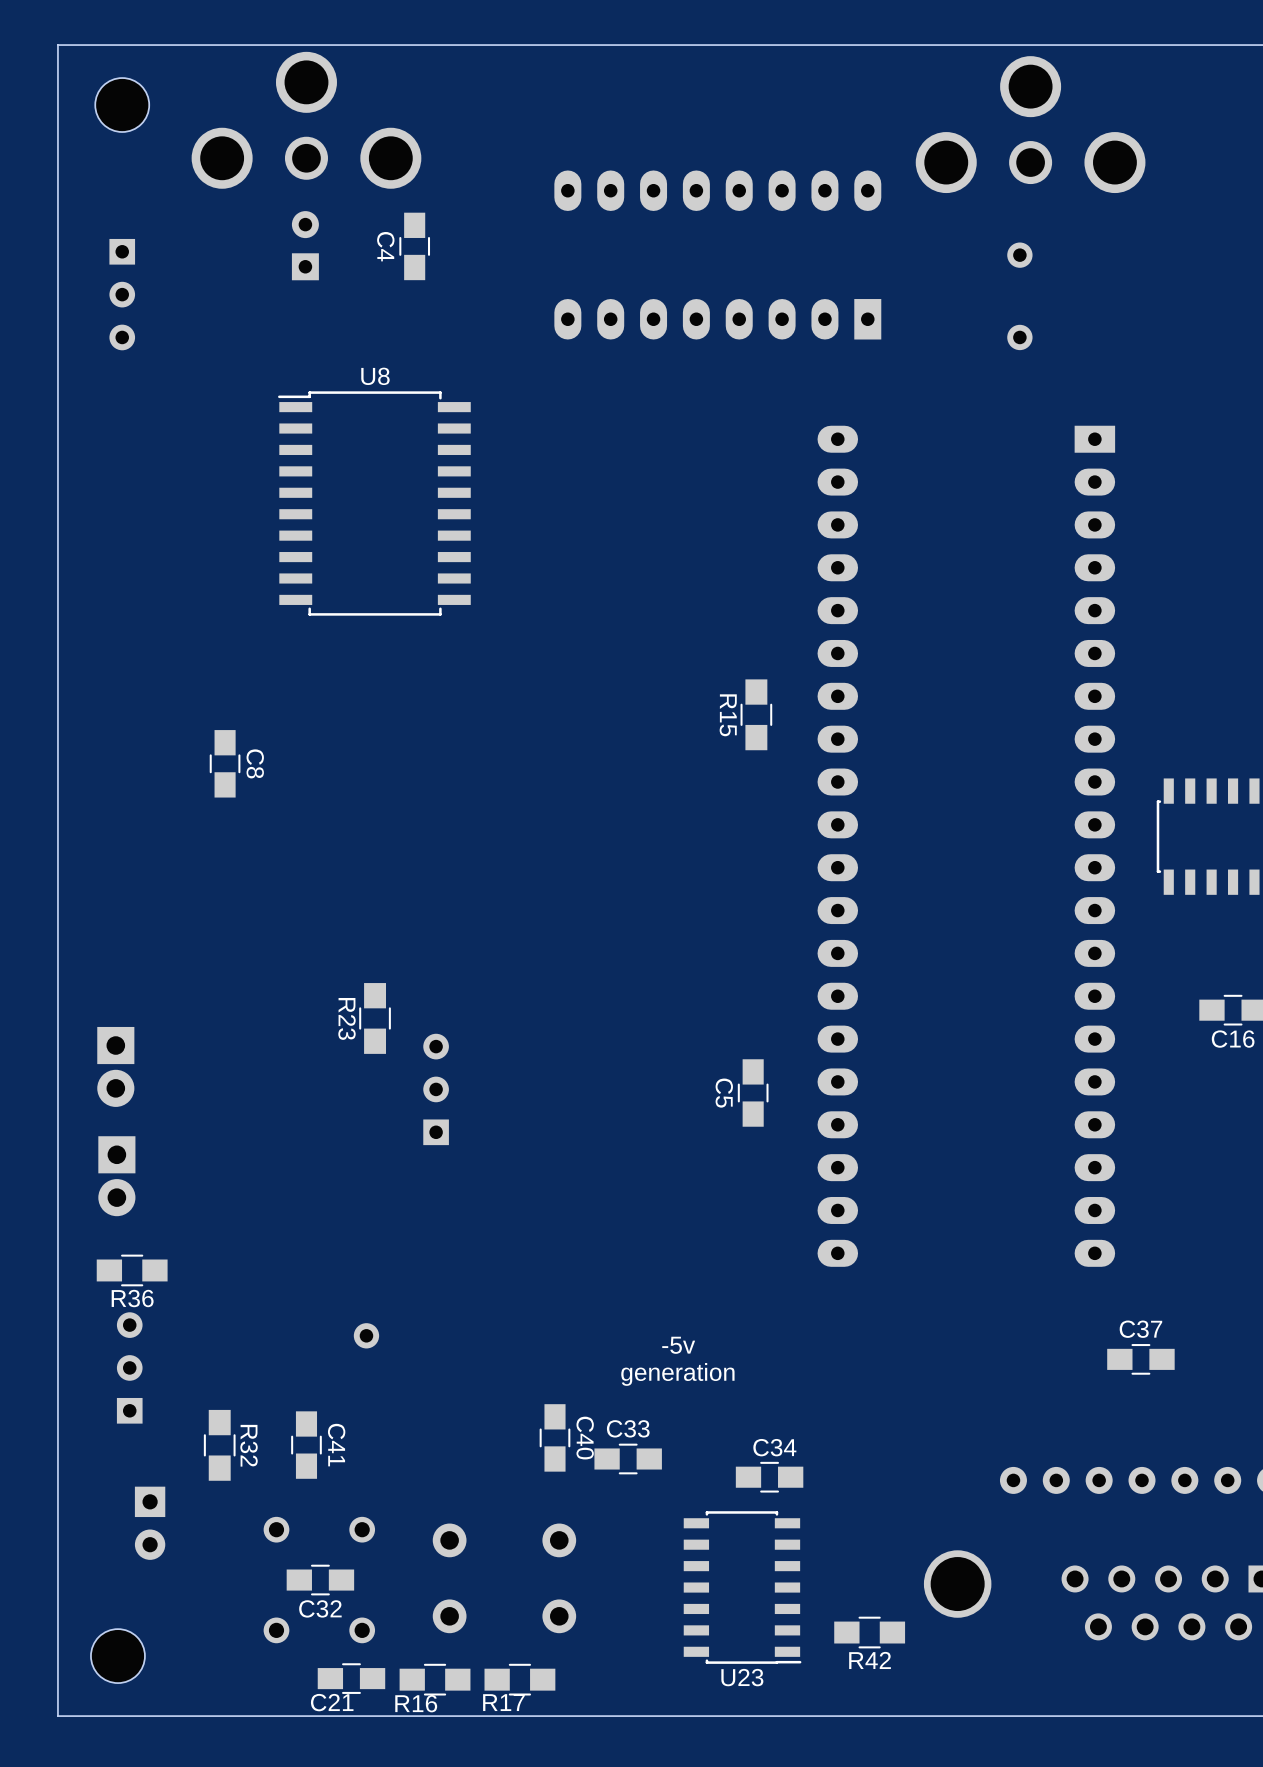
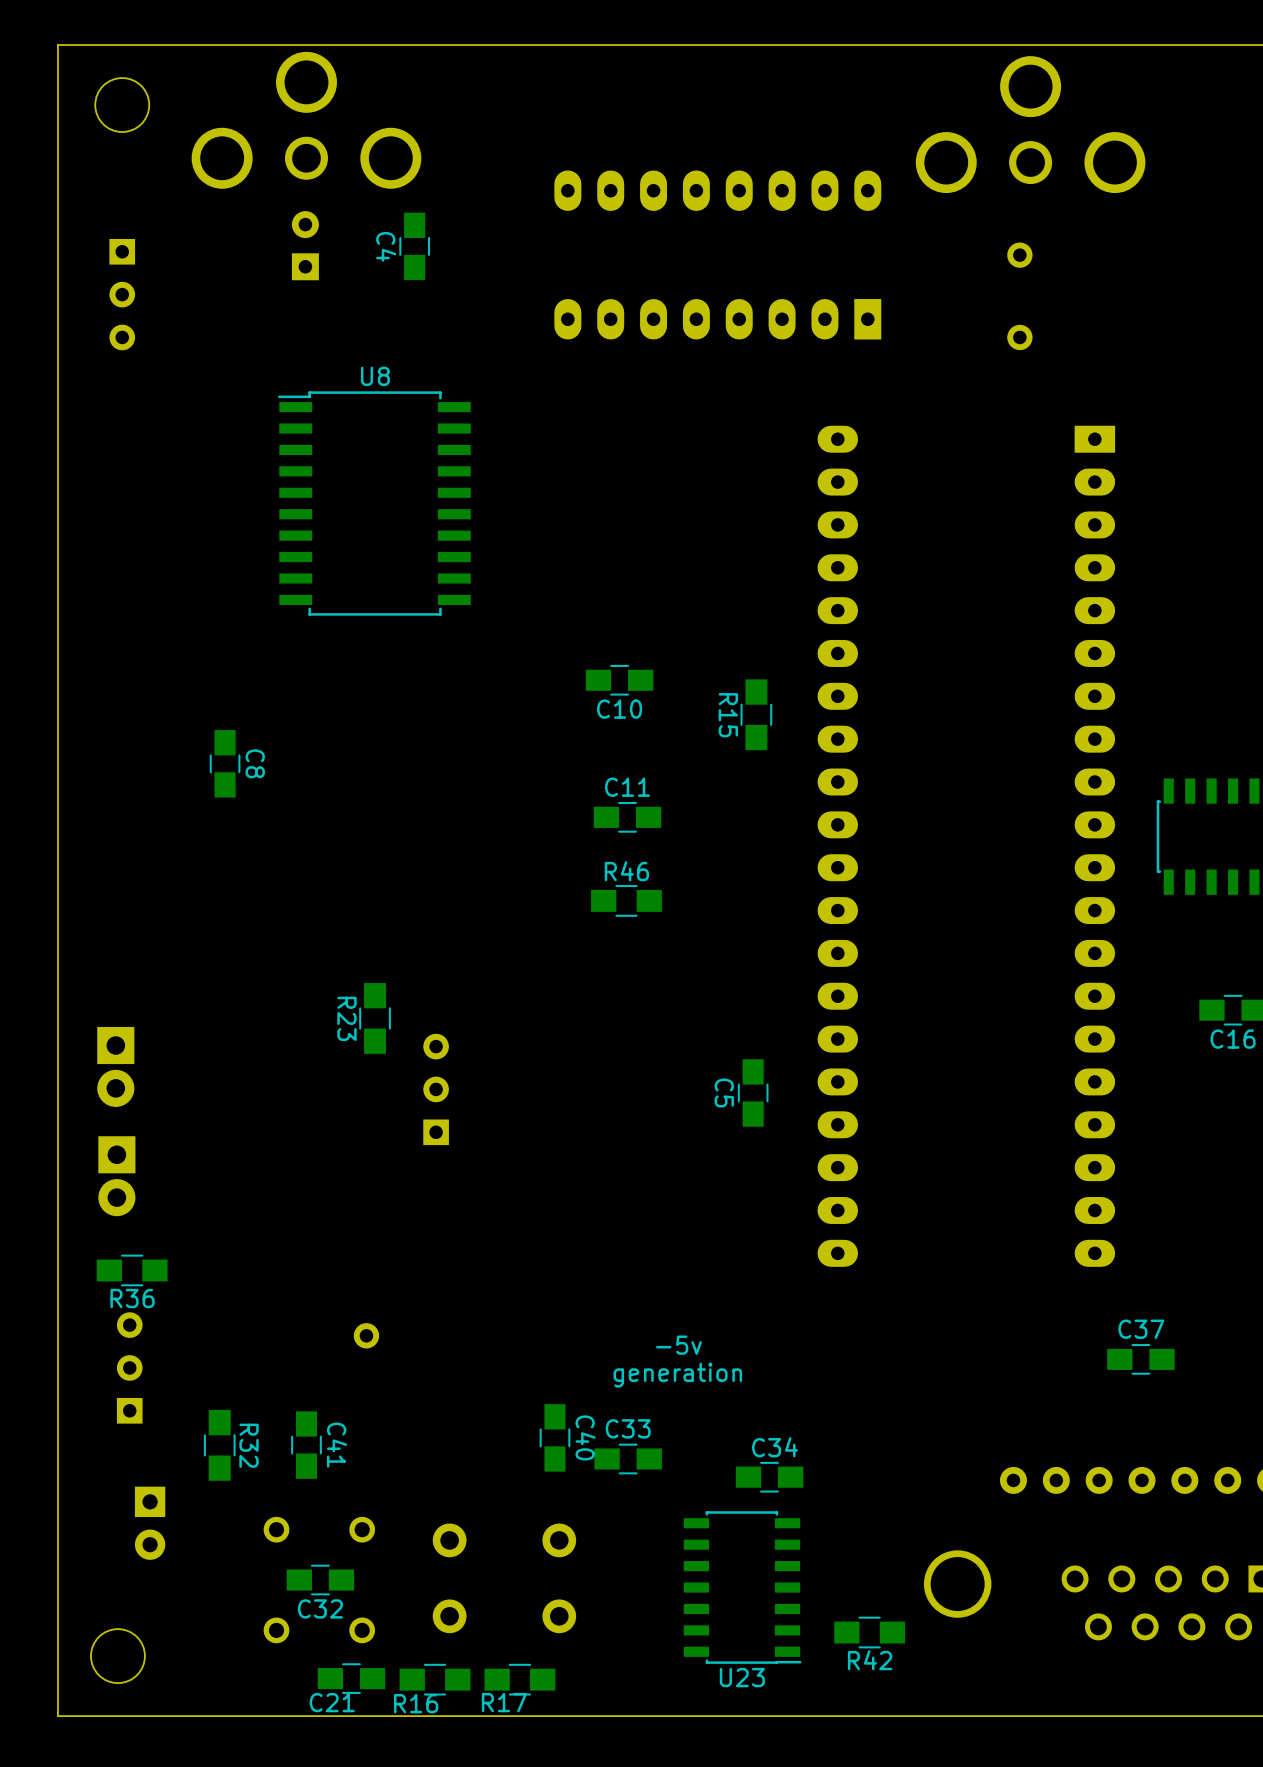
C10: none -> (619, 680)
C11: none -> (627, 817)
R46: none -> (626, 900)

